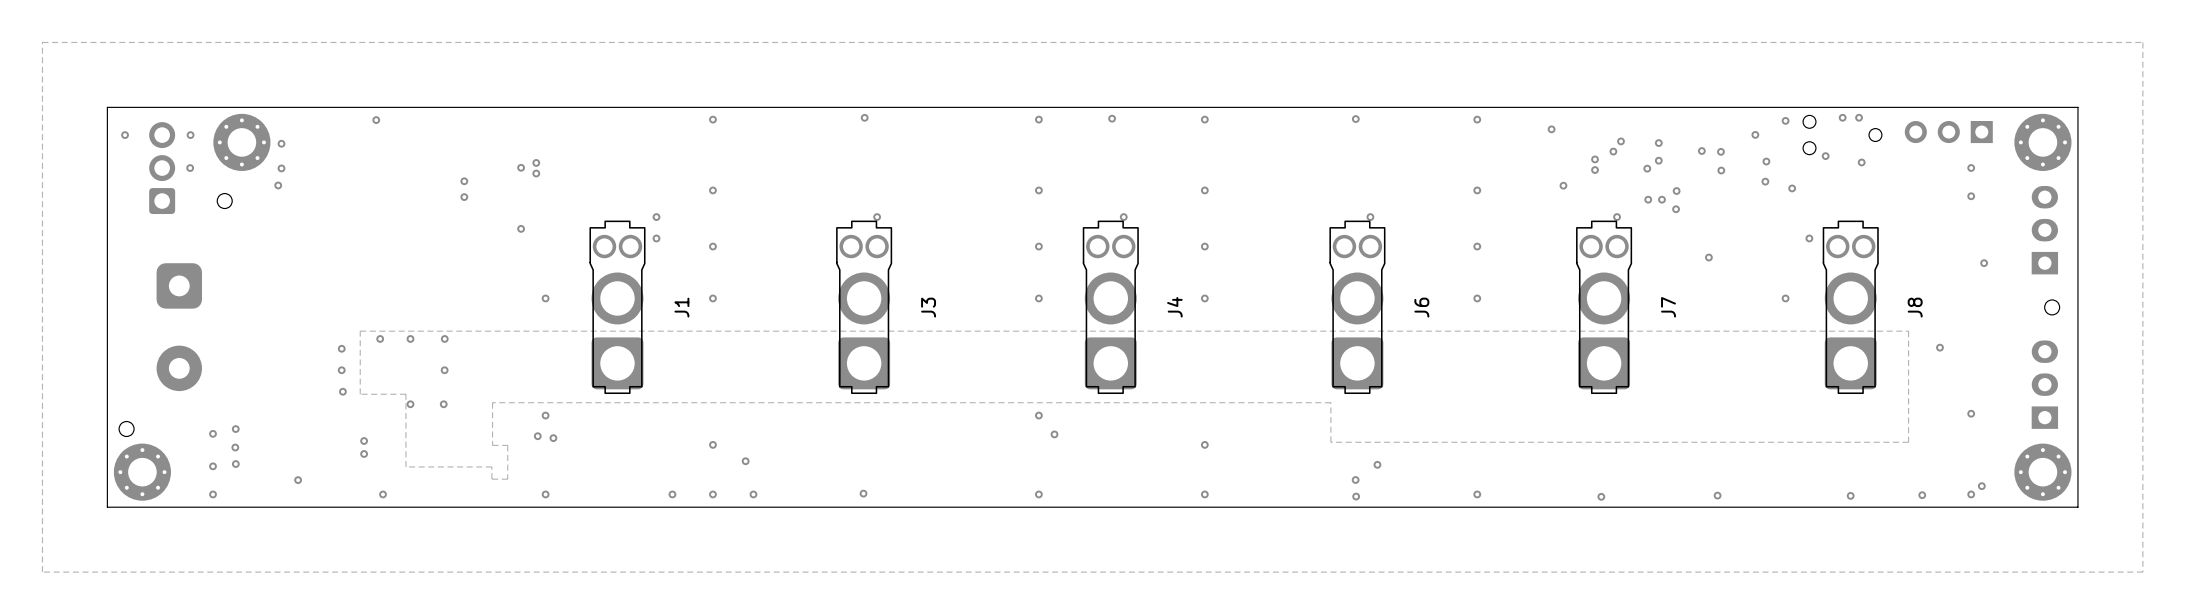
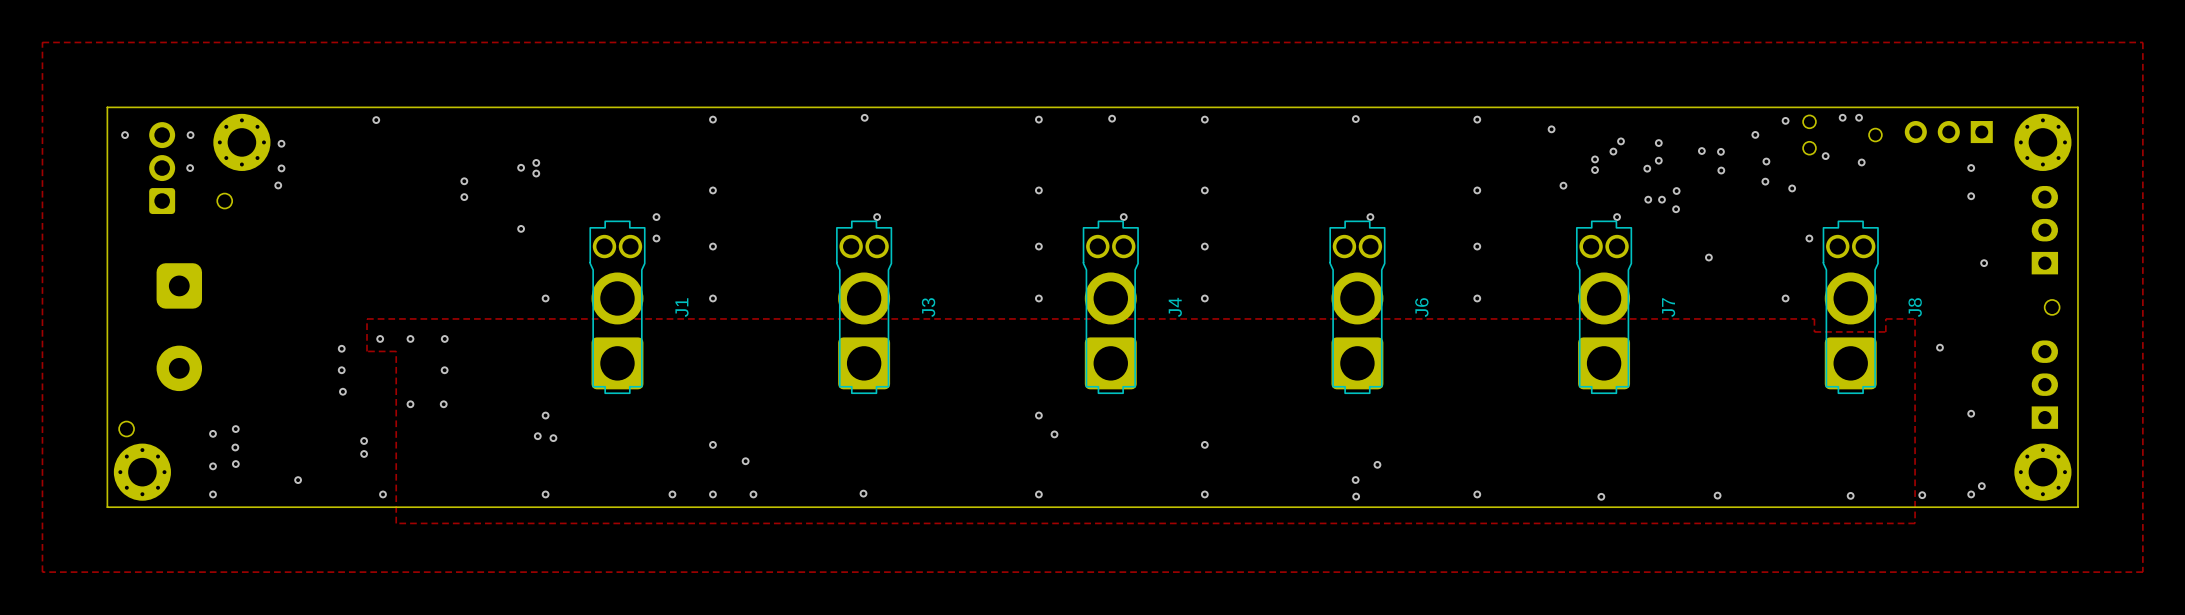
zone outline: (360, 331) (1908, 331) (1908, 442) (1330, 442) (1330, 402) (492, 402) (492, 445) (507, 445) (507, 479) (491, 479) (491, 466) (405, 466) (405, 394) (360, 394) (360, 331) -> (367, 318) (367, 351) (396, 351) (396, 523) (1915, 523) (1915, 318) (1885, 318) (1885, 331) (1814, 331) (1814, 318) (367, 318)

